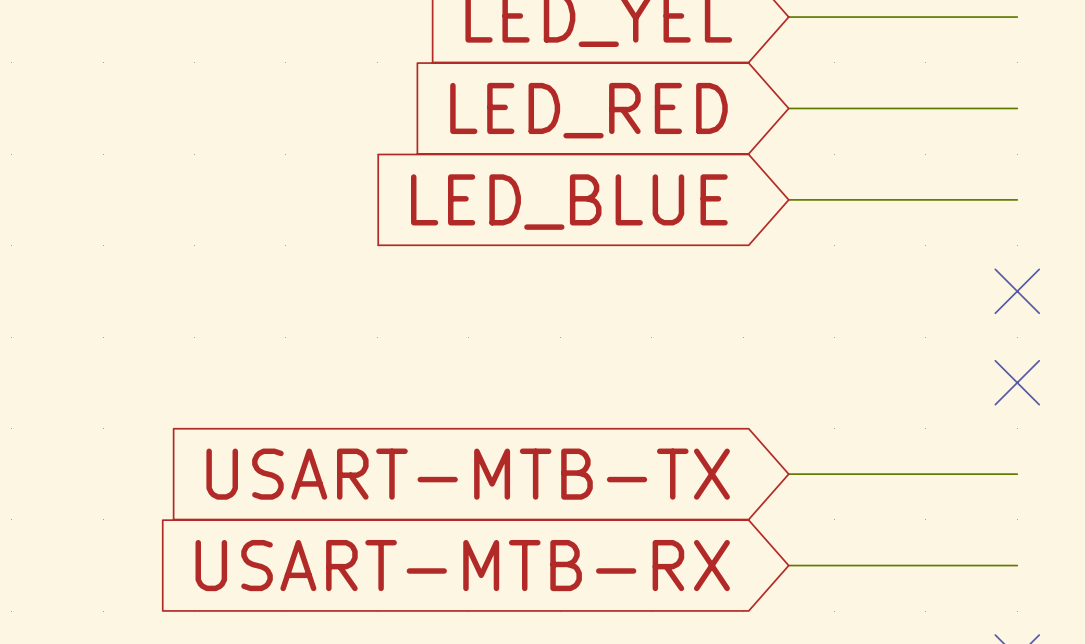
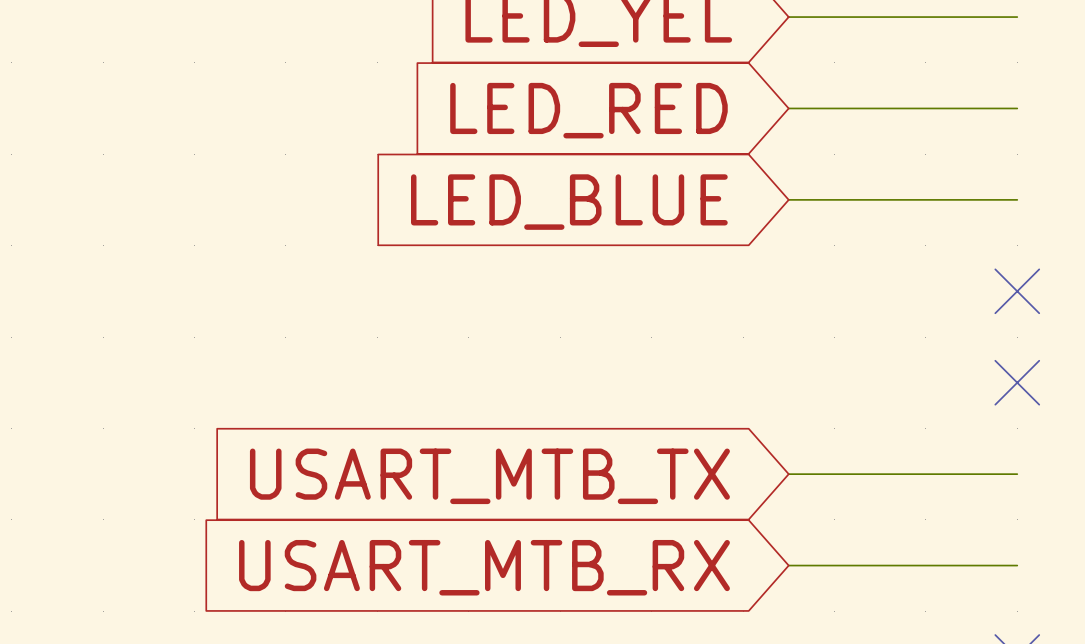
global label: USART-MTB-TX (468, 474) -> USART_MTB_TX (489, 476)
global label: USART-MTB-RX (462, 565) -> USART_MTB_RX (484, 567)

